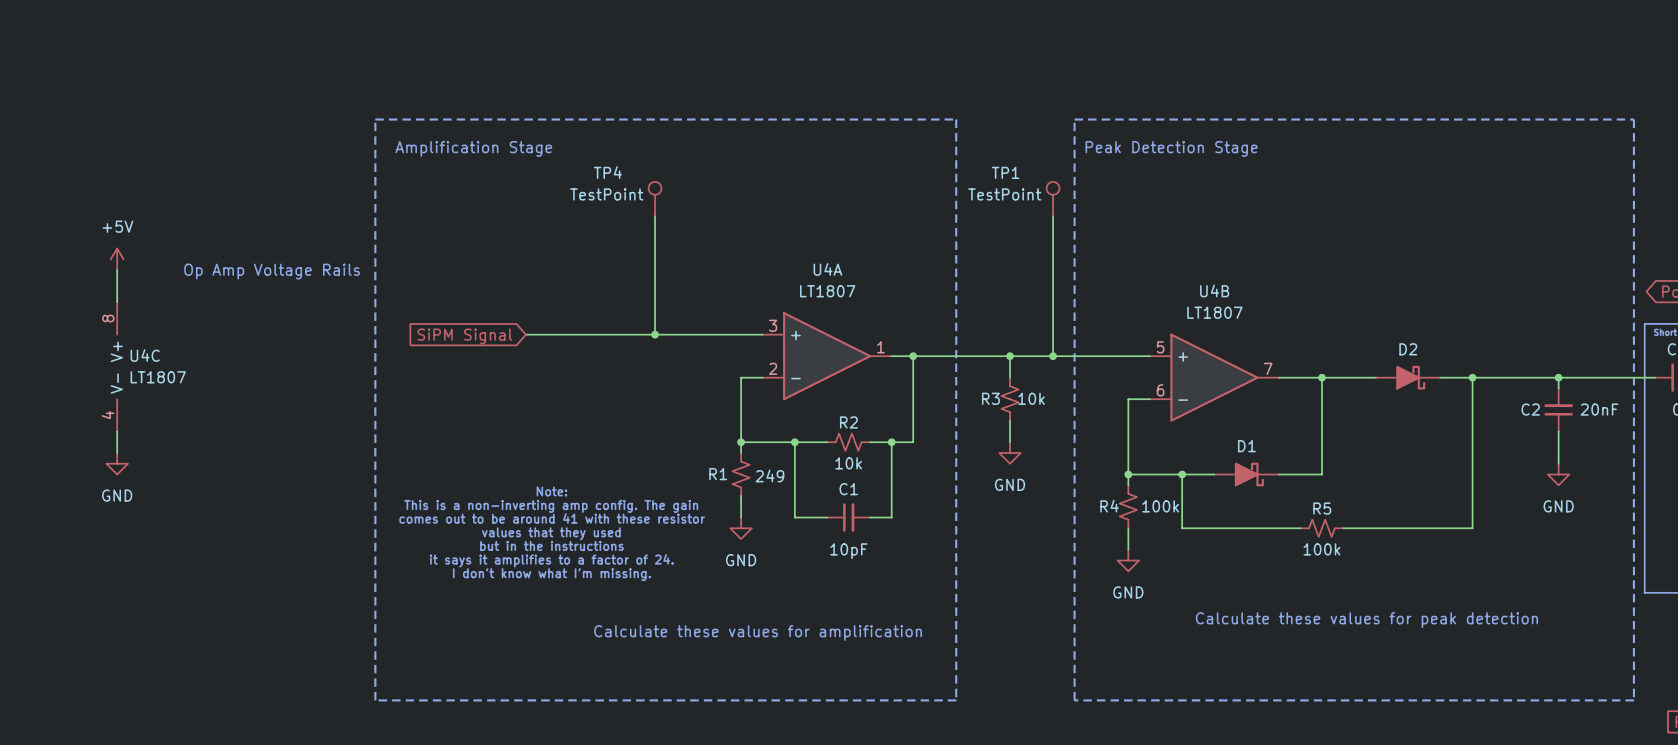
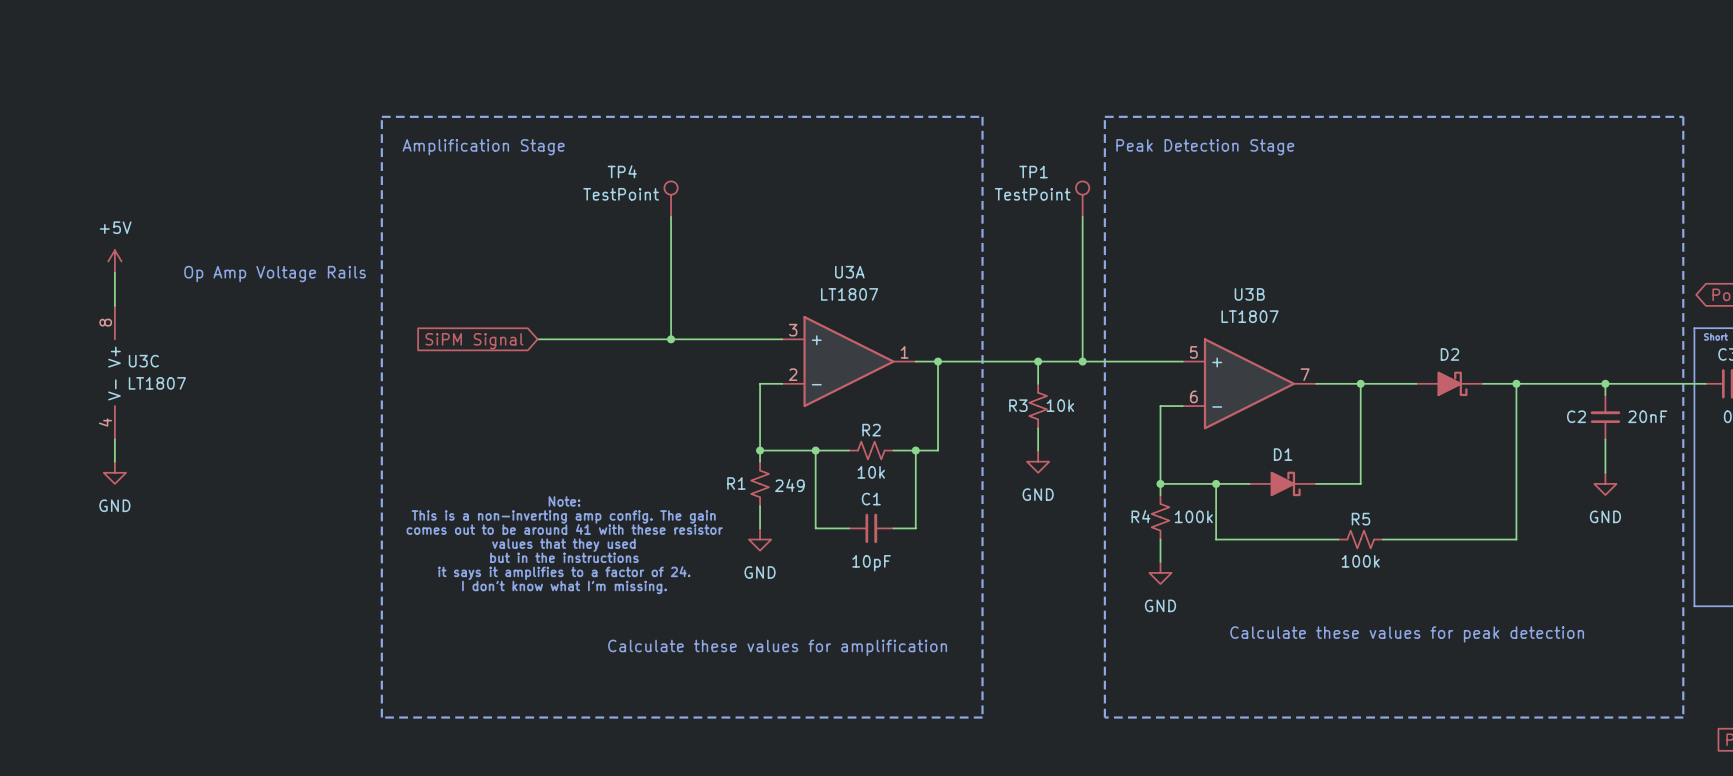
U4A name: U4A (827, 269) -> U3A (849, 272)
U4B name: U4B (1214, 290) -> U3B (1249, 294)
U4C name: U4C (145, 355) -> U3C (143, 361)

